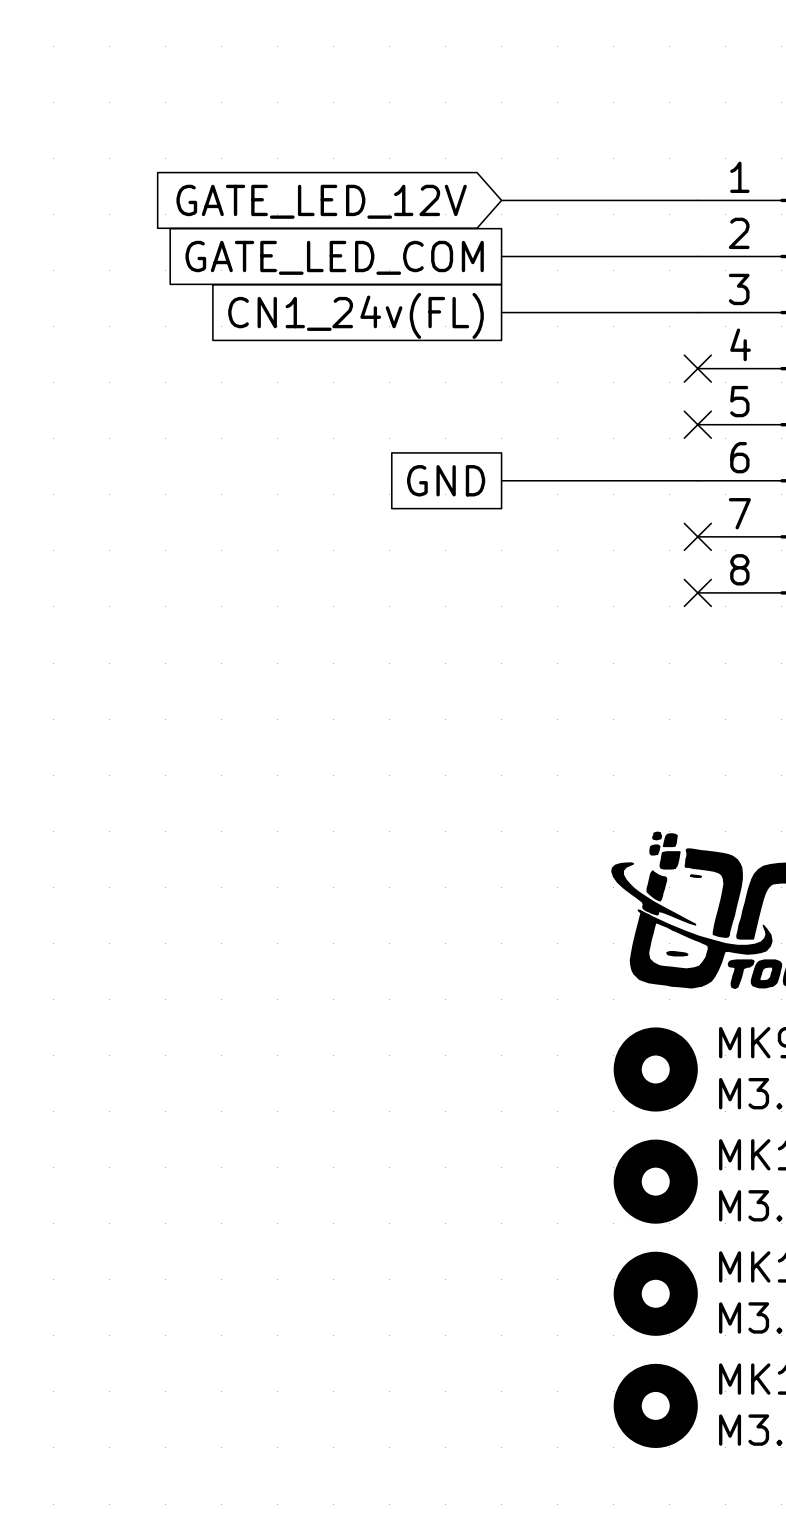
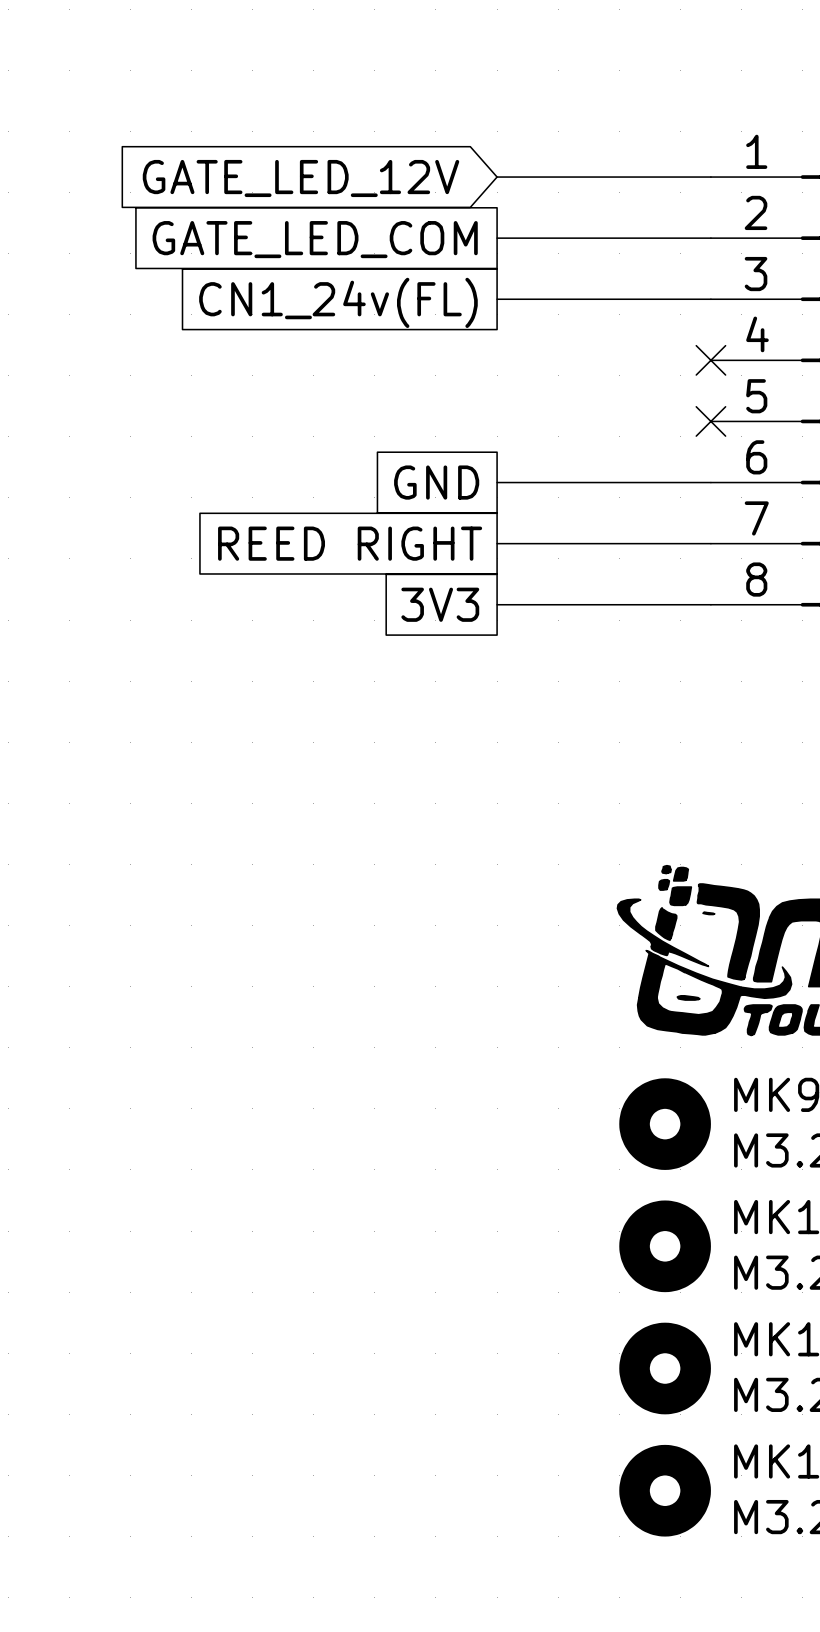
global label: none -> REED RIGHT (350, 543)
wire: none -> (497, 543) (710, 543)
no-connect mark: (697, 536) -> none
global label: none -> 3V3 (440, 604)
wire: none -> (497, 604) (710, 604)
no-connect mark: (697, 592) -> none

